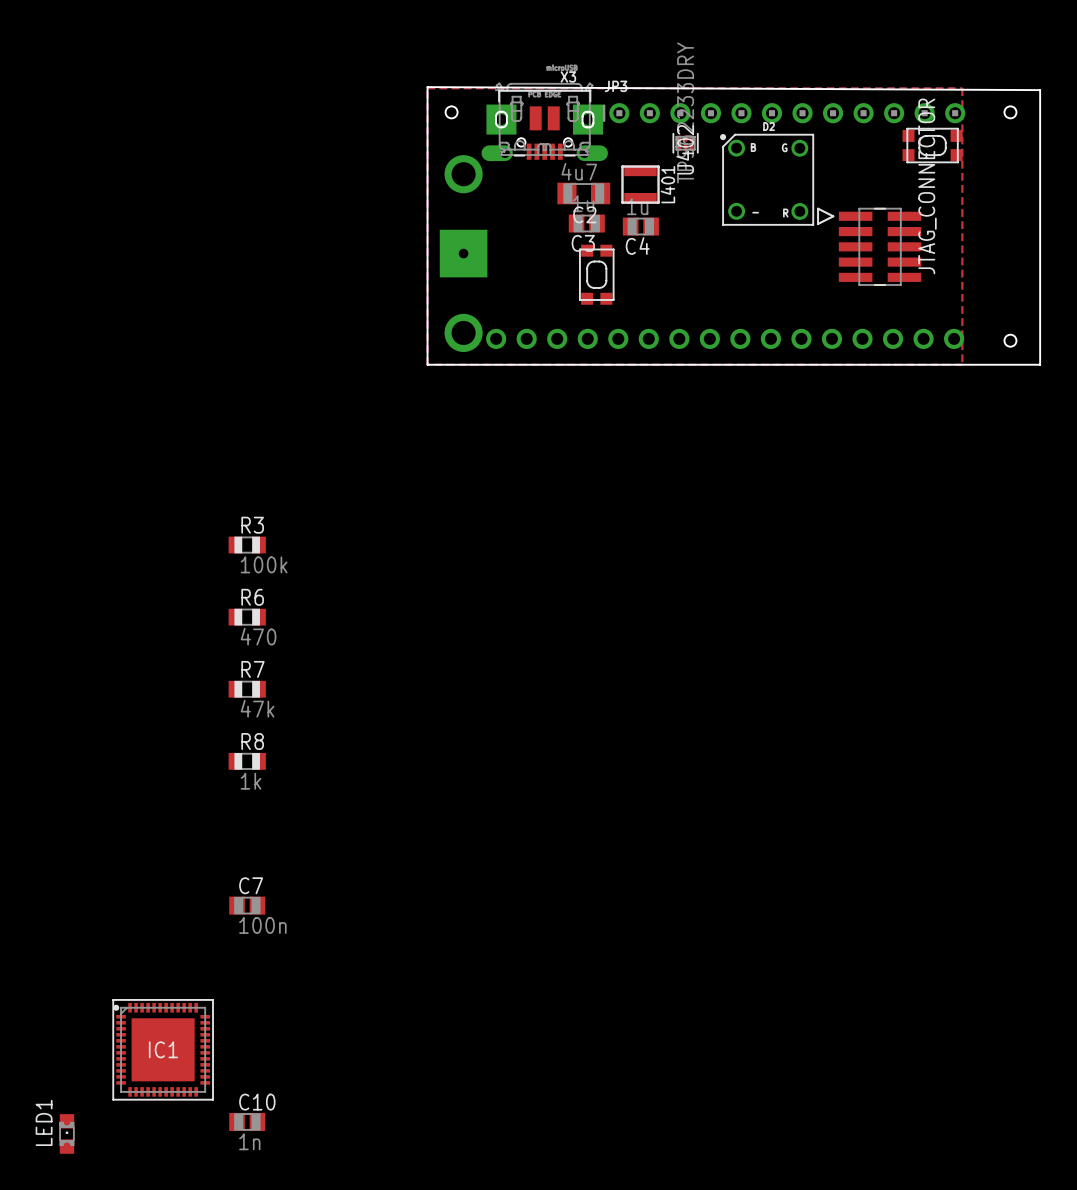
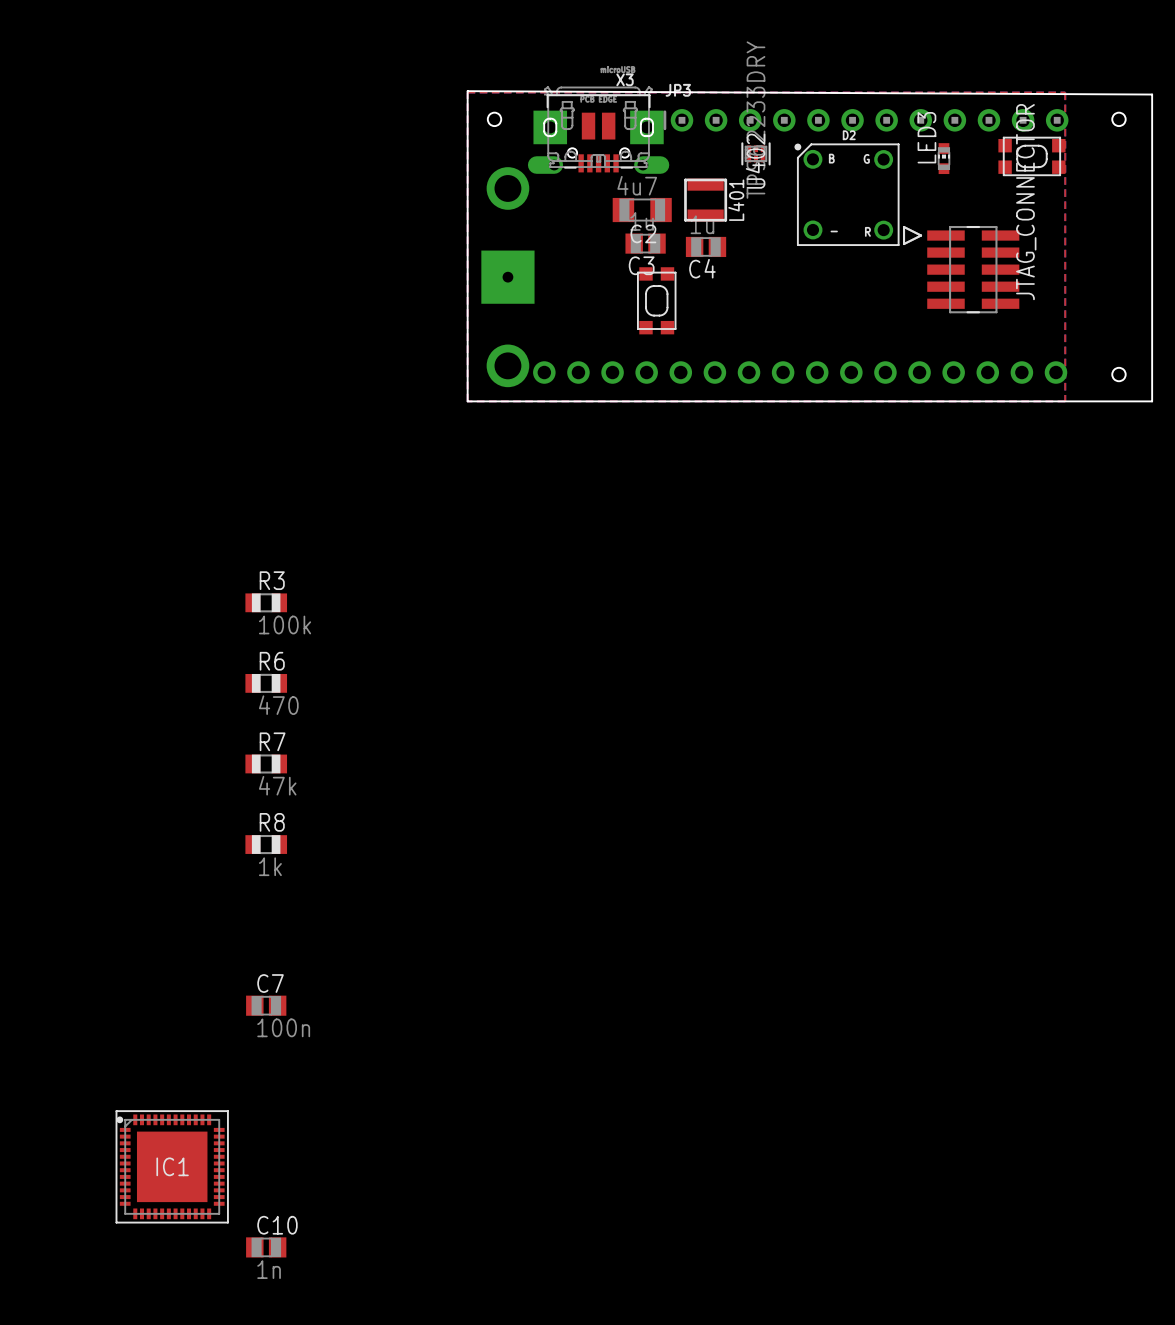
LED3: none -> (943, 158)
LED1: (66, 1133) -> none

